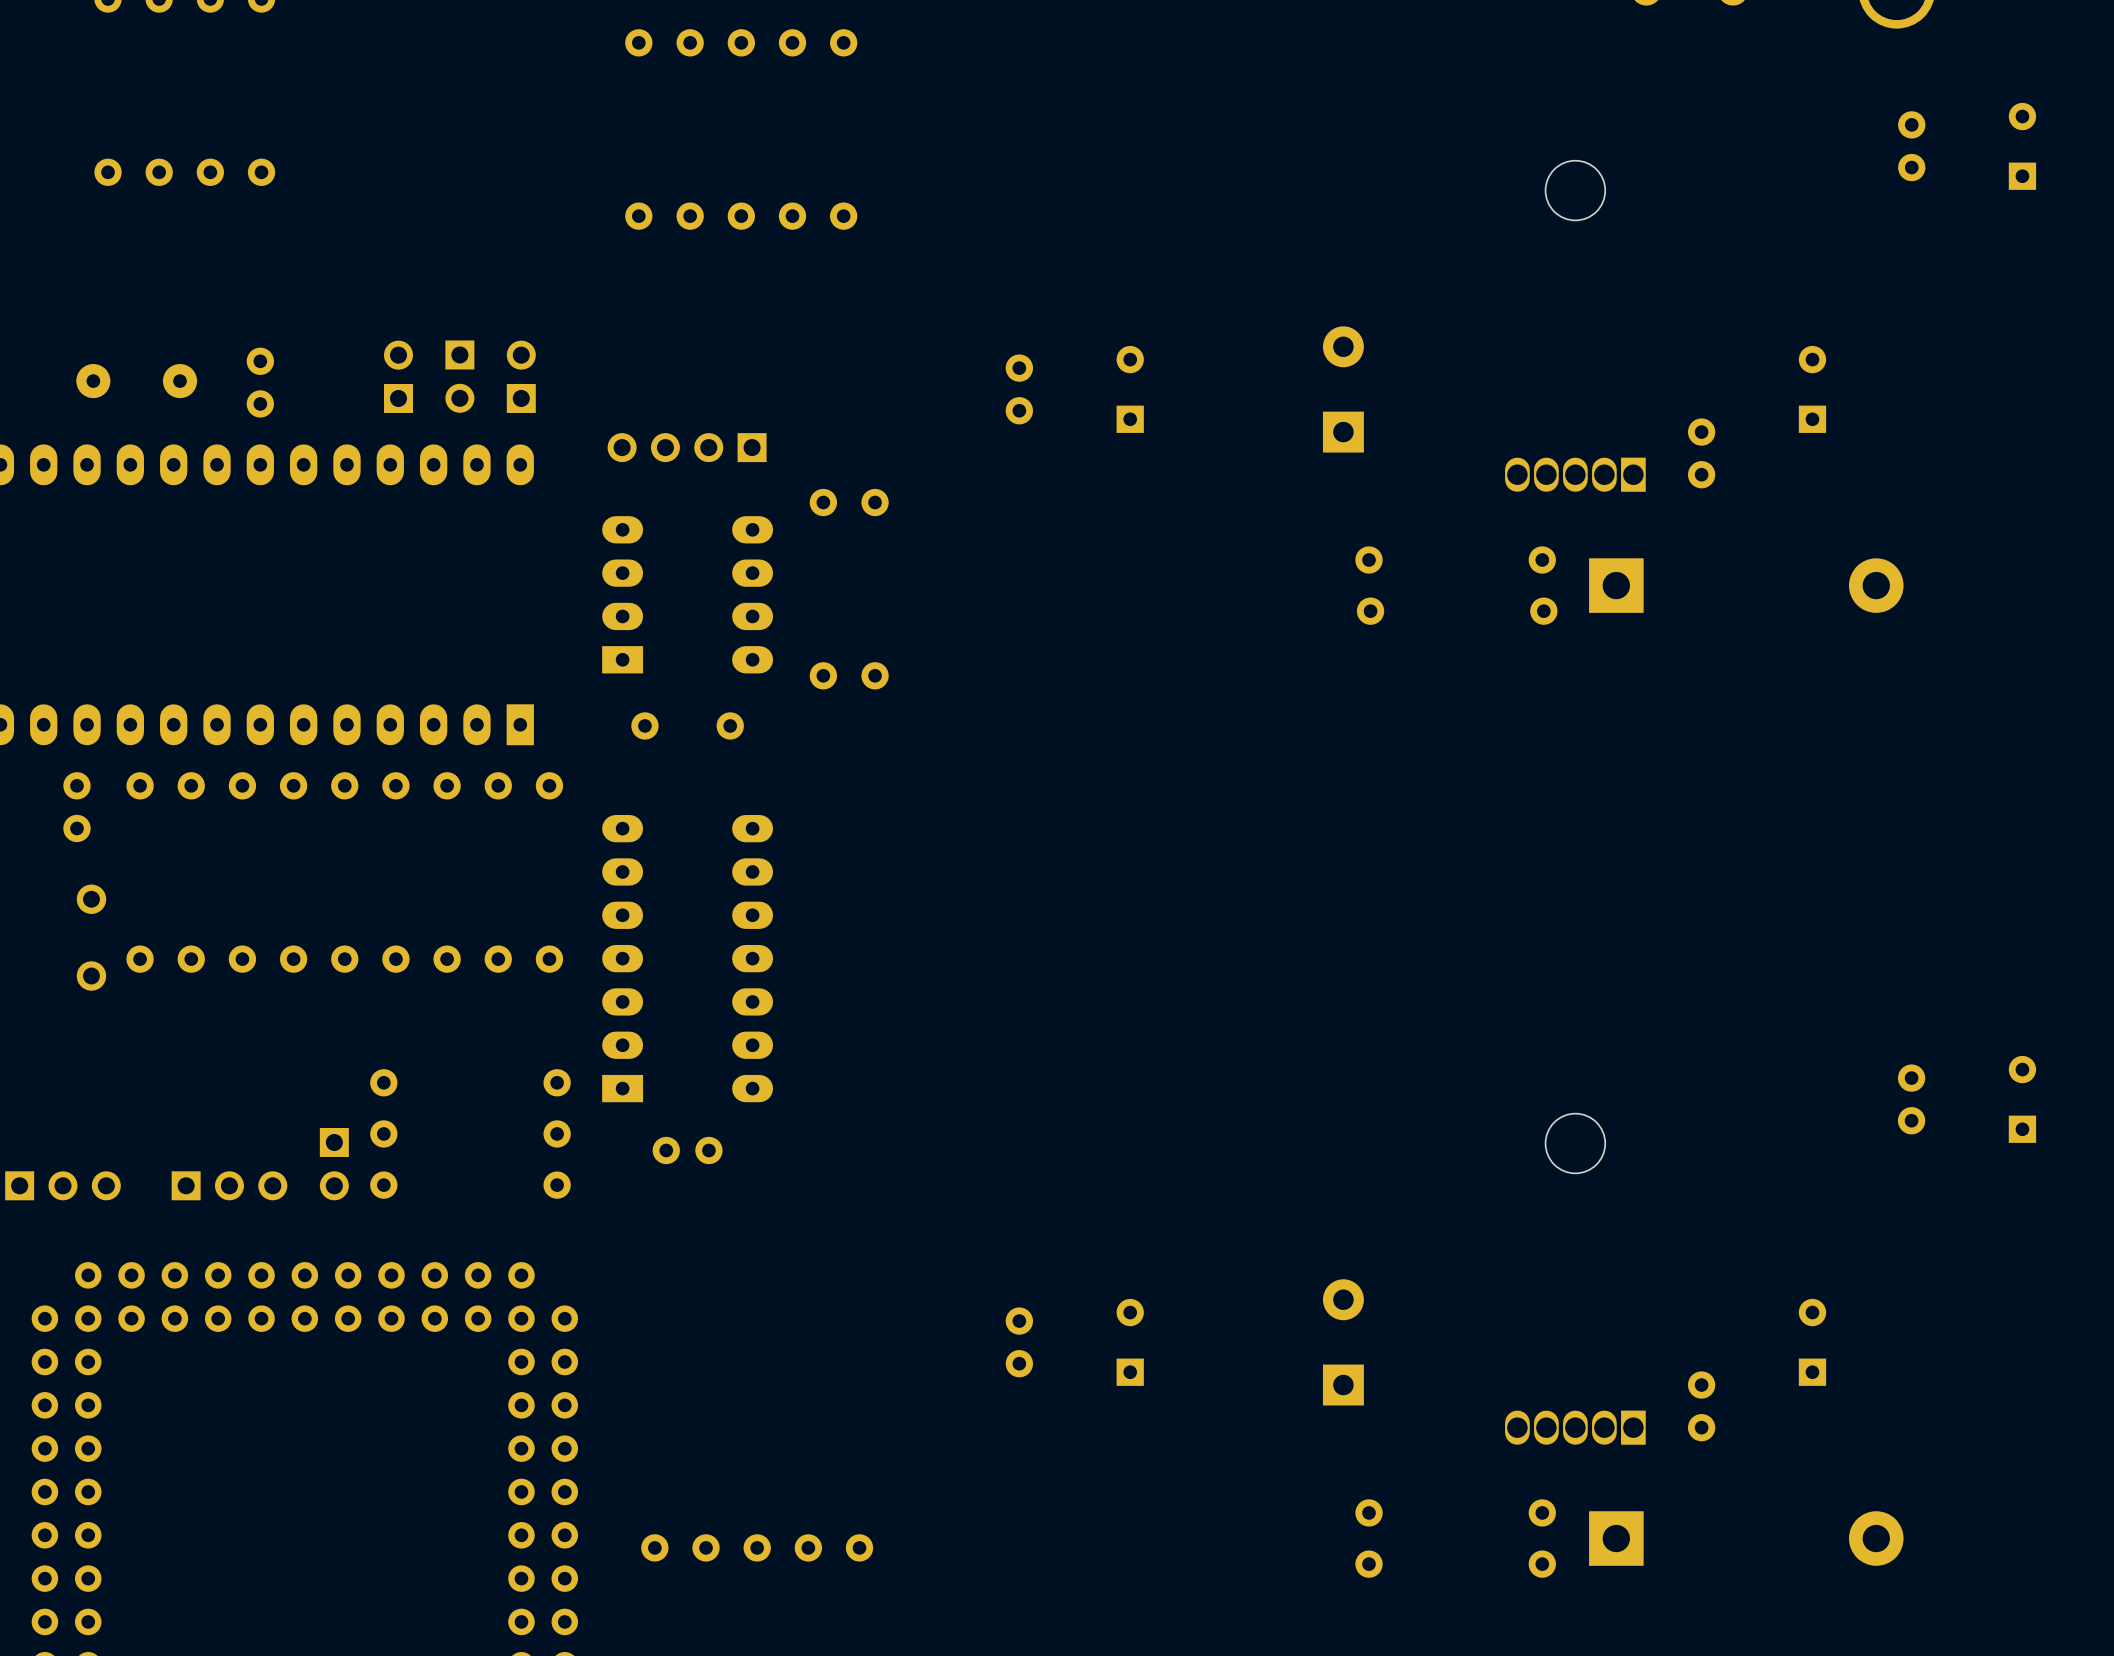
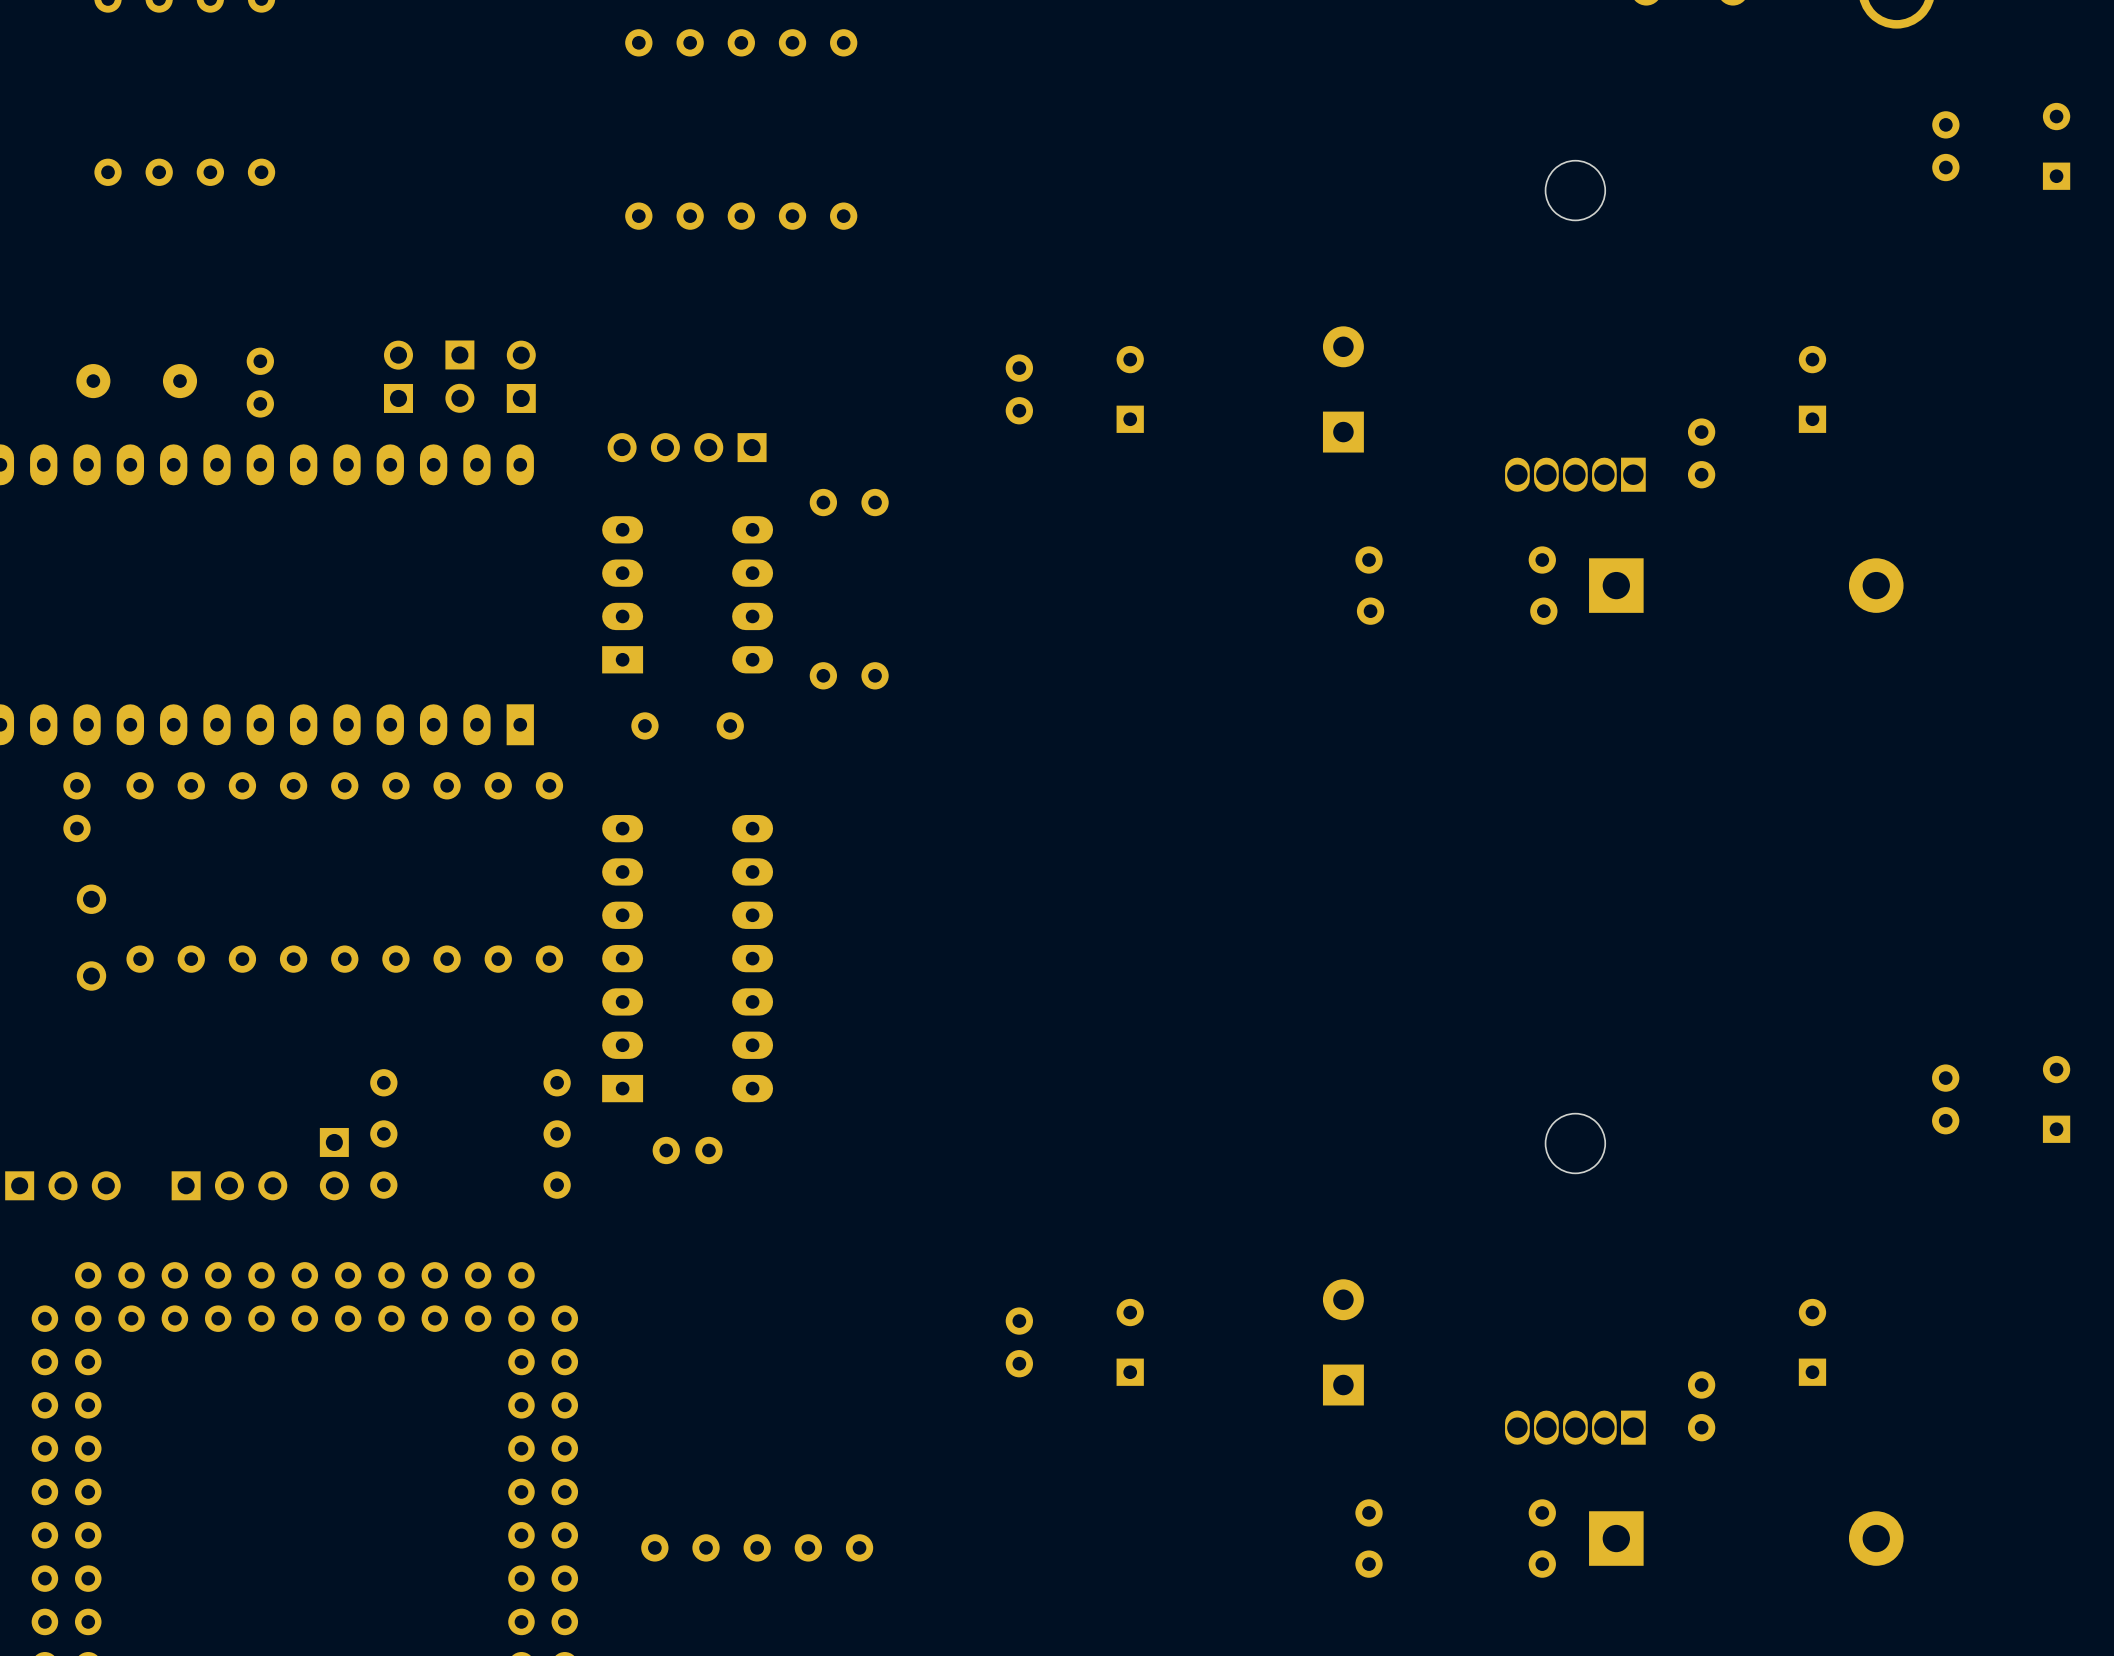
part position: (1911, 146) -> (1945, 146)
part position: (2022, 146) -> (2056, 146)
part position: (1911, 1099) -> (1945, 1099)
part position: (2022, 1099) -> (2056, 1099)

